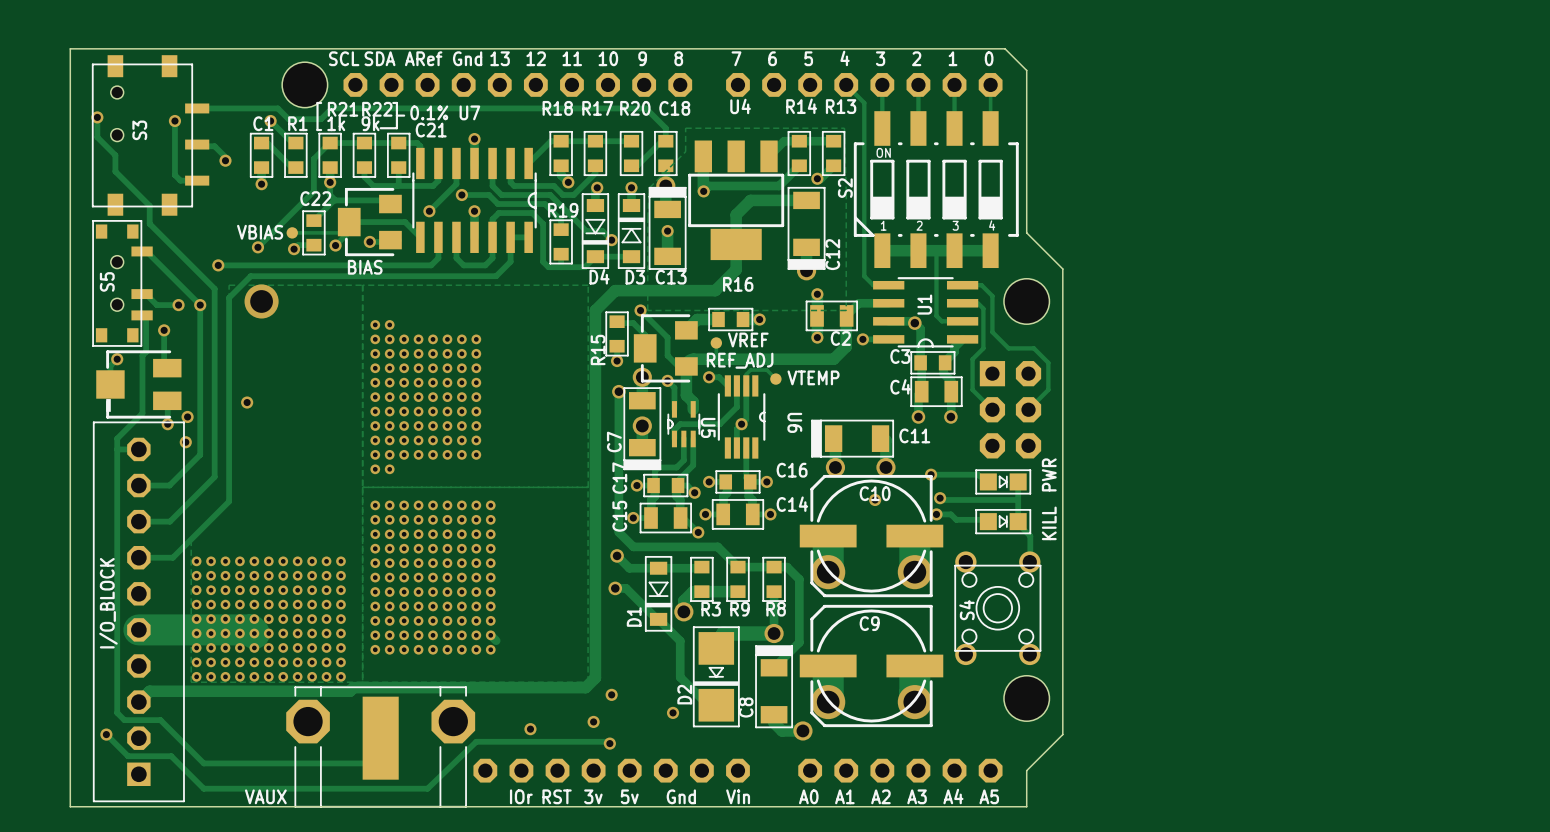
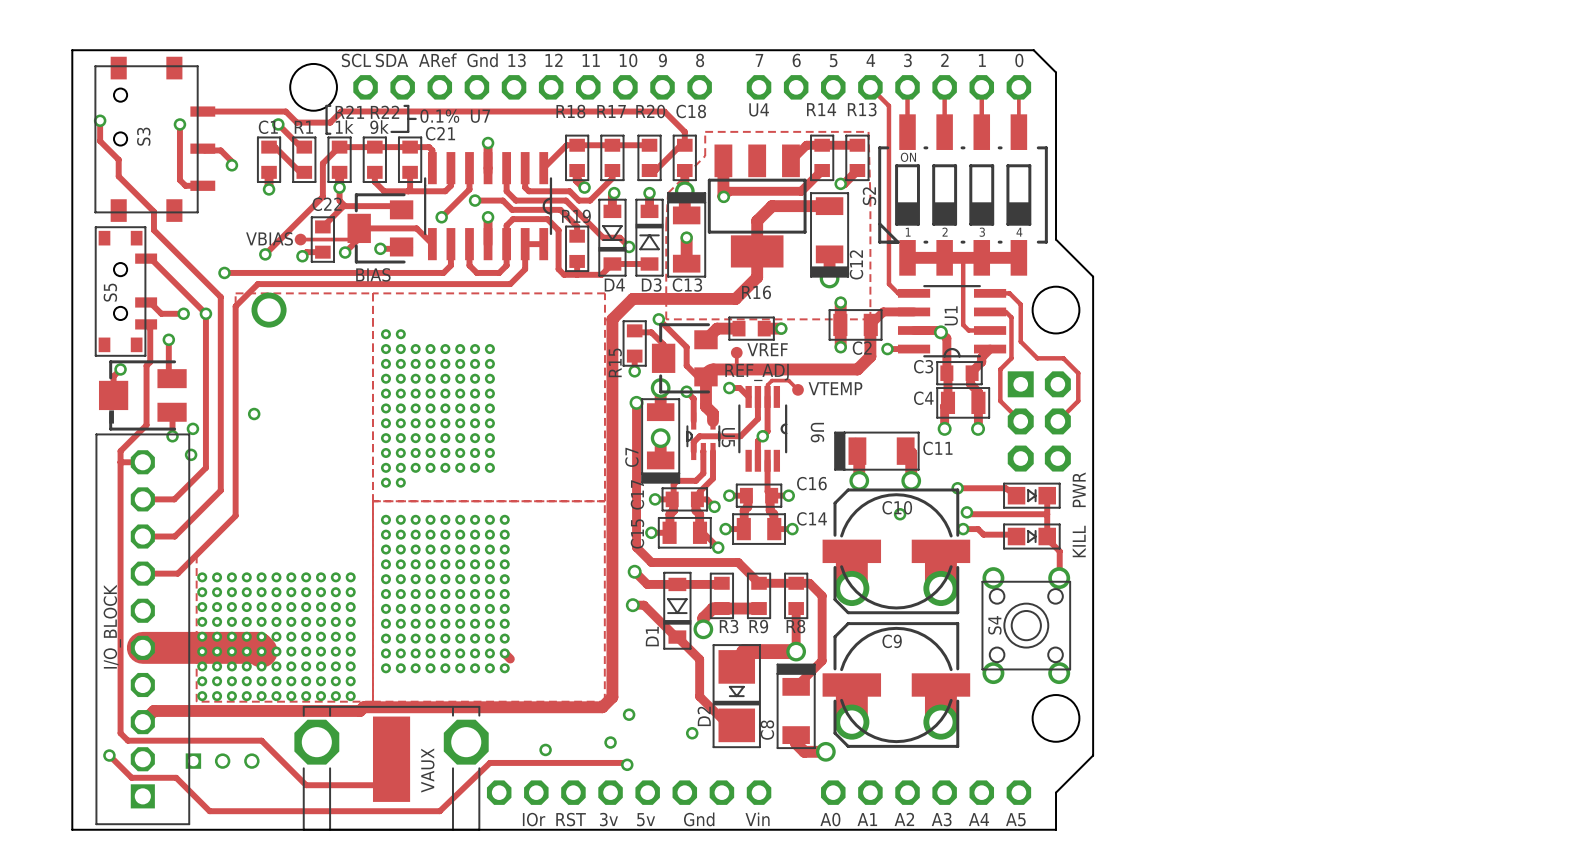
track: (160, 720) (203, 763) (297, 763) -> (165, 740) (261, 740) (306, 785)
part: none -> (222, 761)
VAUX name rotation: 0° (265, 796) -> 90° counterclockwise (427, 770)
VAUX name position: VAUX (265, 796) -> VAUX (427, 770)

